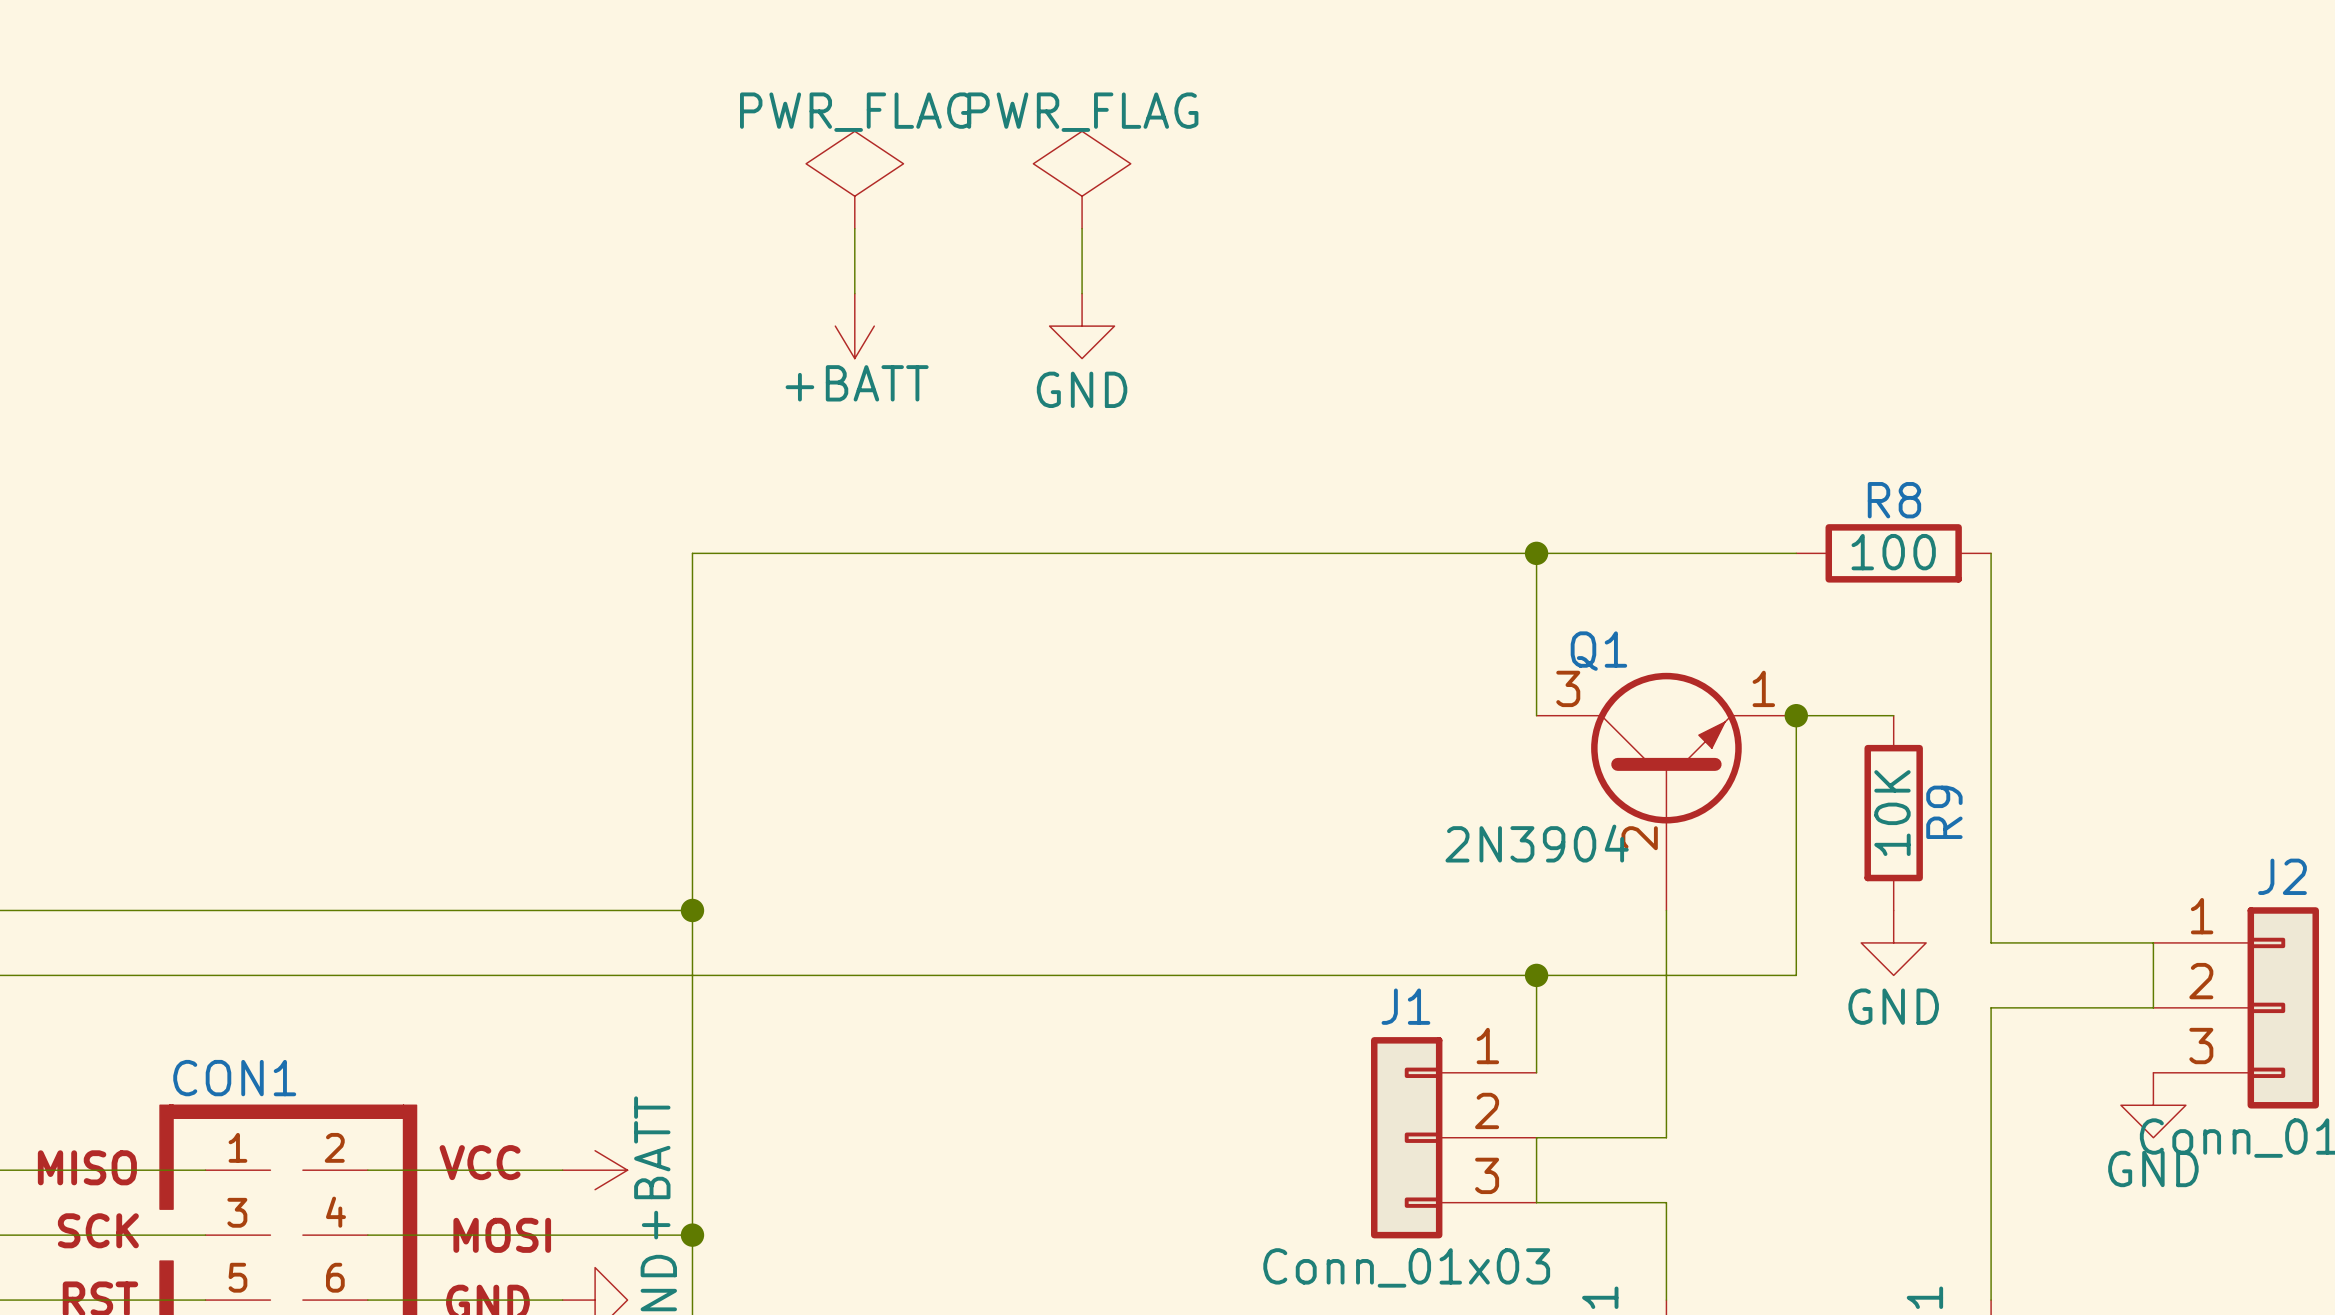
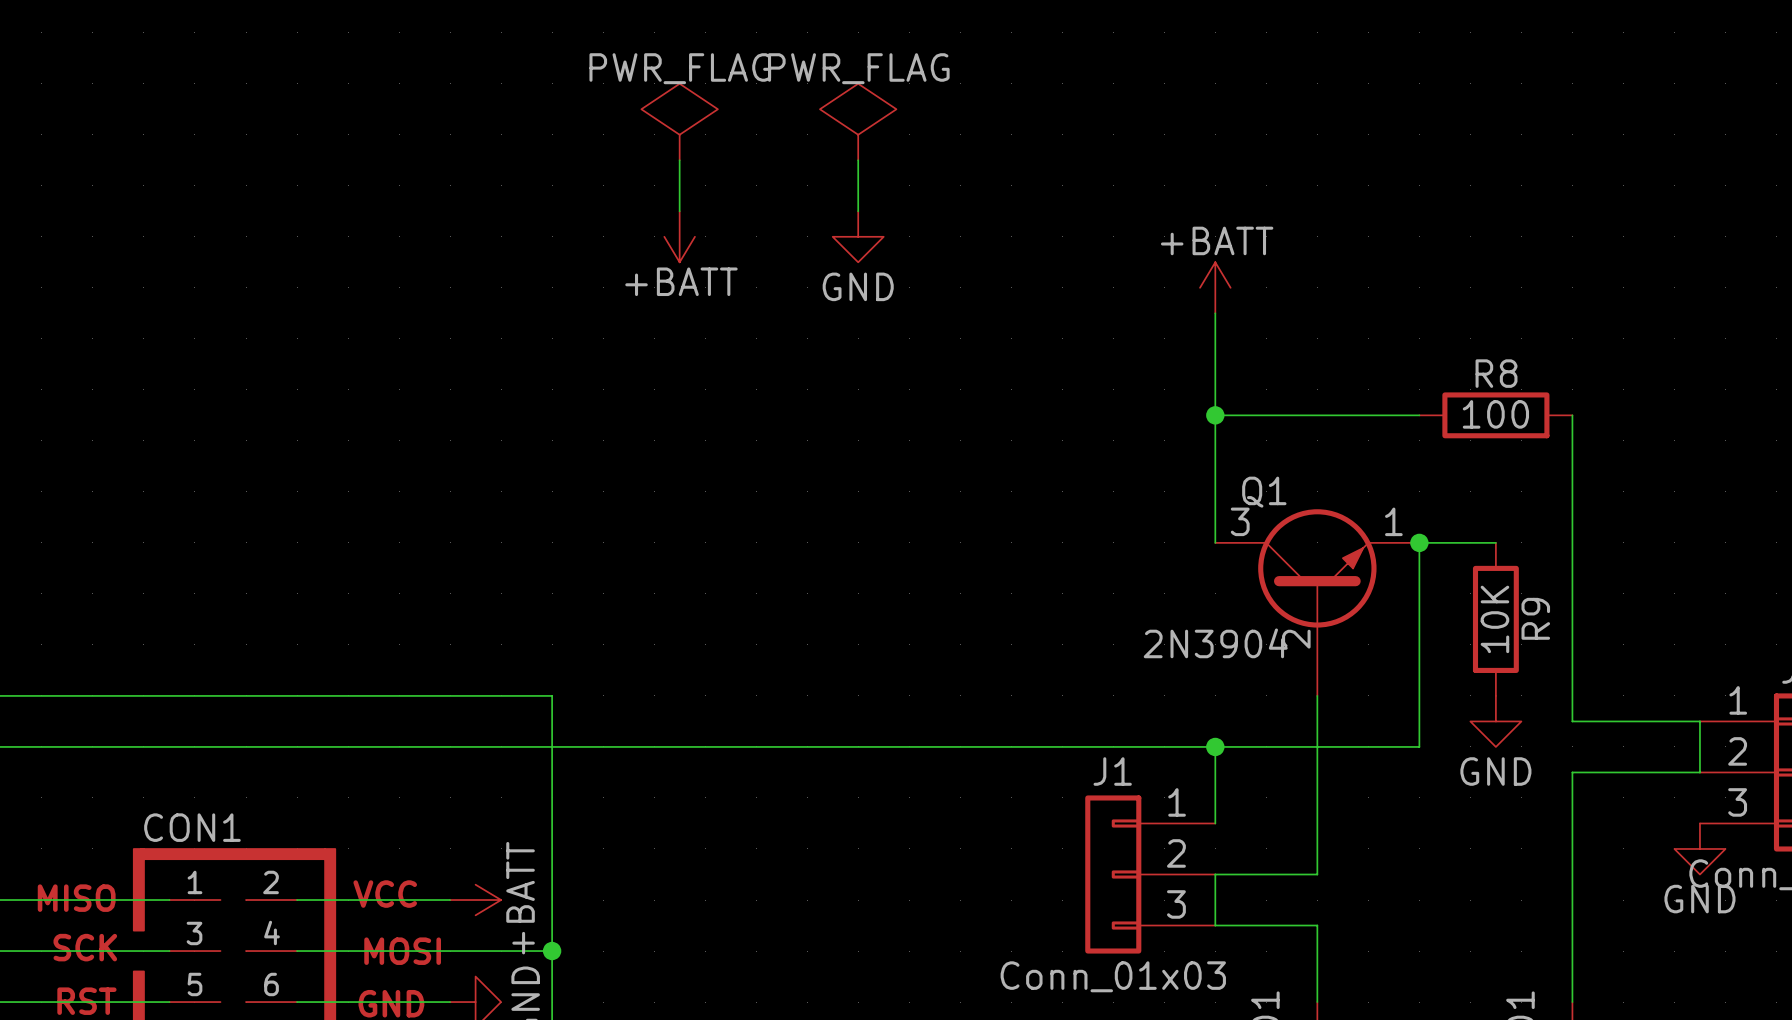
power symbol: none -> +BATT (1215, 287)
wire: (1536, 553) (692, 553) (692, 910) -> (1215, 415) (1215, 313)
junction: (692, 910) -> none

